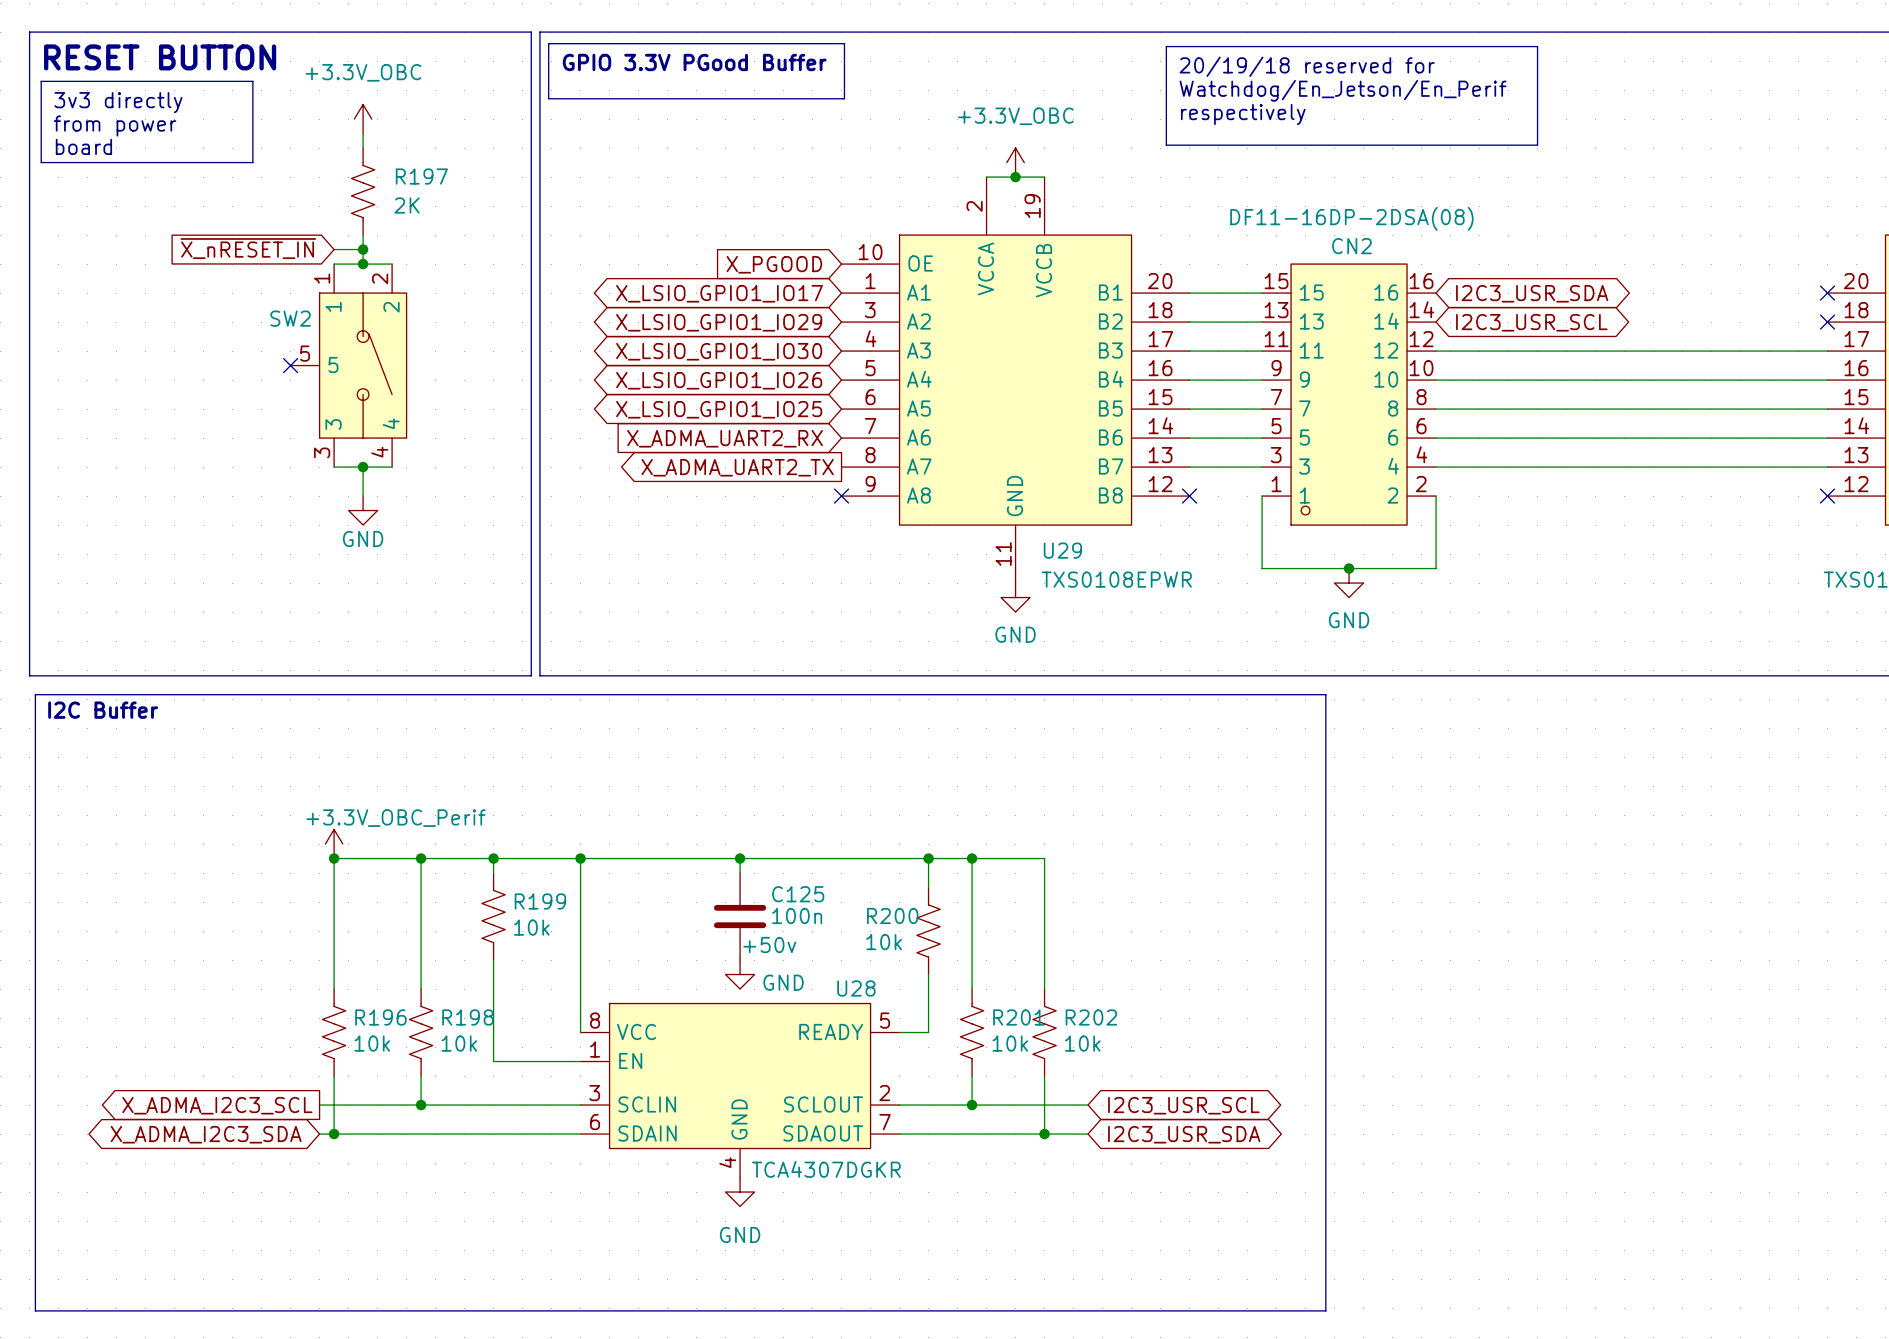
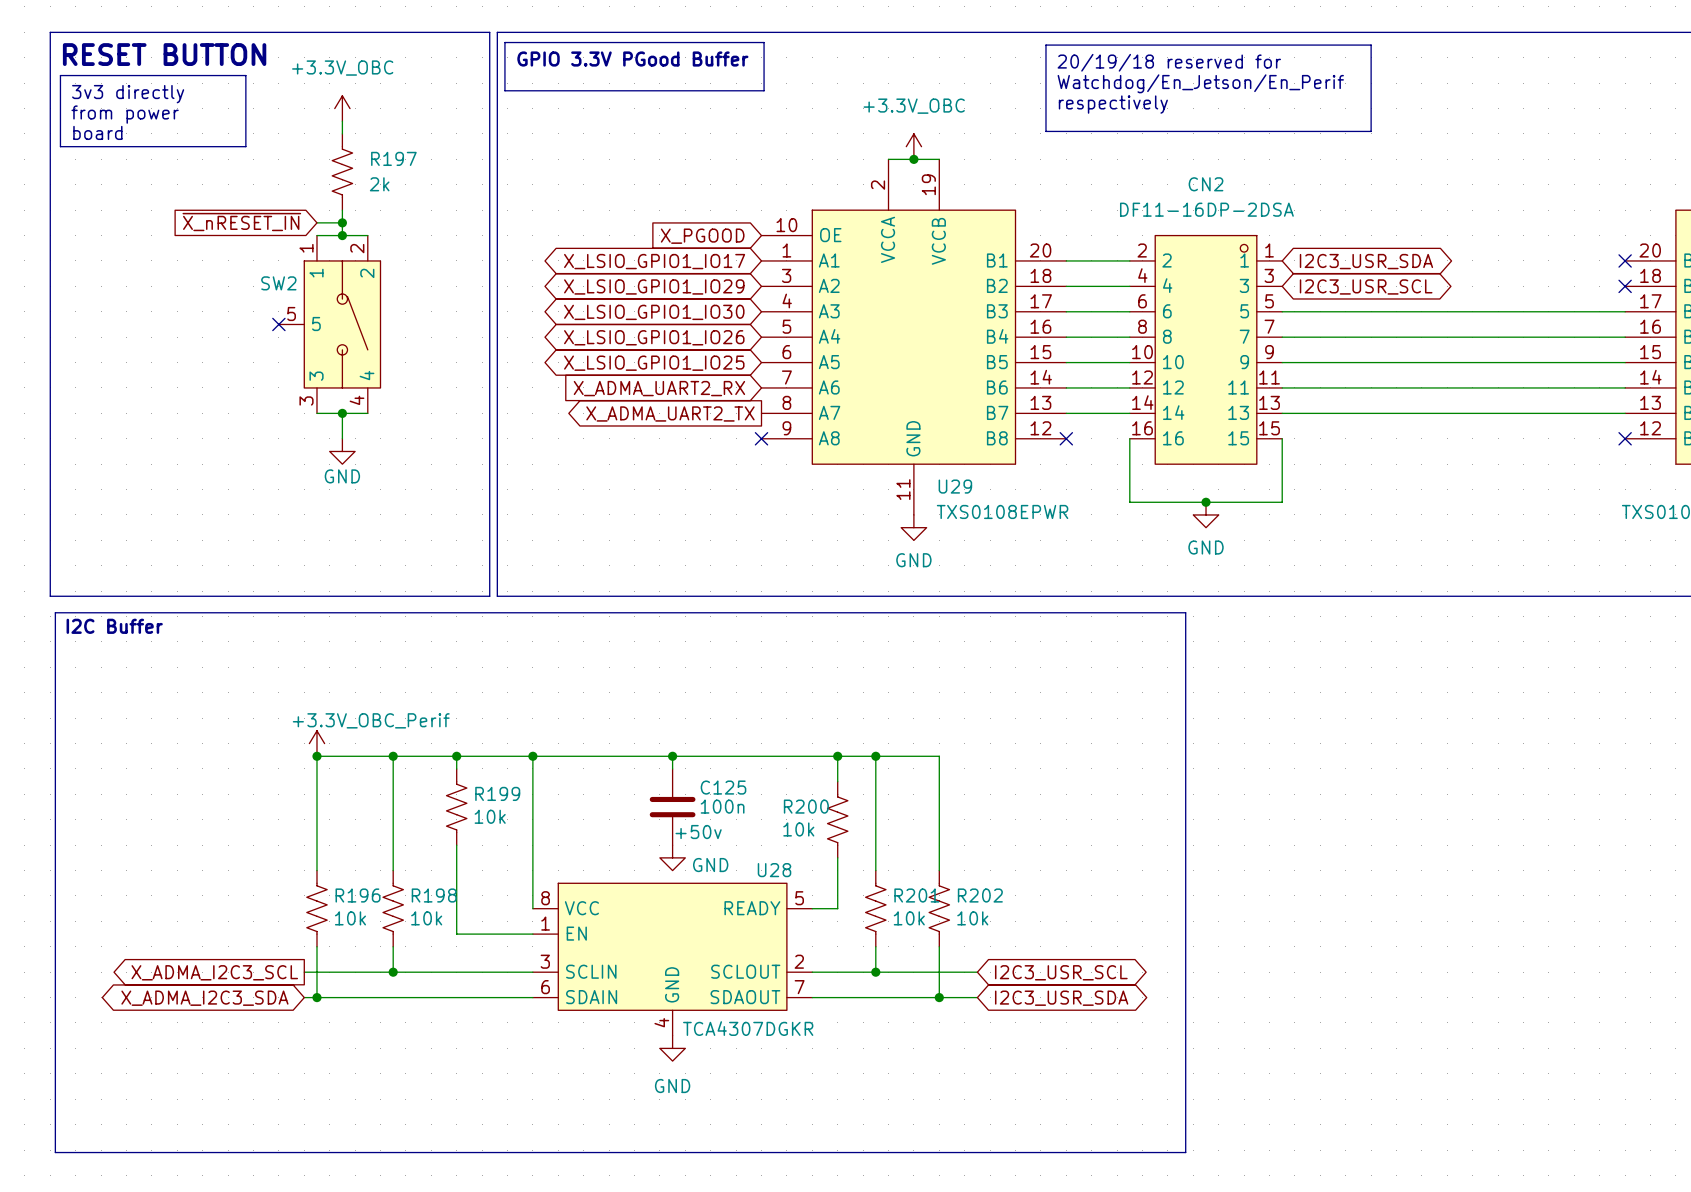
R197 value: 2K (407, 205) -> 2k (379, 184)
CN2 value: DF11-16DP-2DSA(08) (1351, 218) -> DF11-16DP-2DSA (1206, 209)
CN2 name position: CN2 (1351, 246) -> CN2 (1206, 184)
CN2 rotation: 0° (1349, 394) -> 180° (1206, 349)

